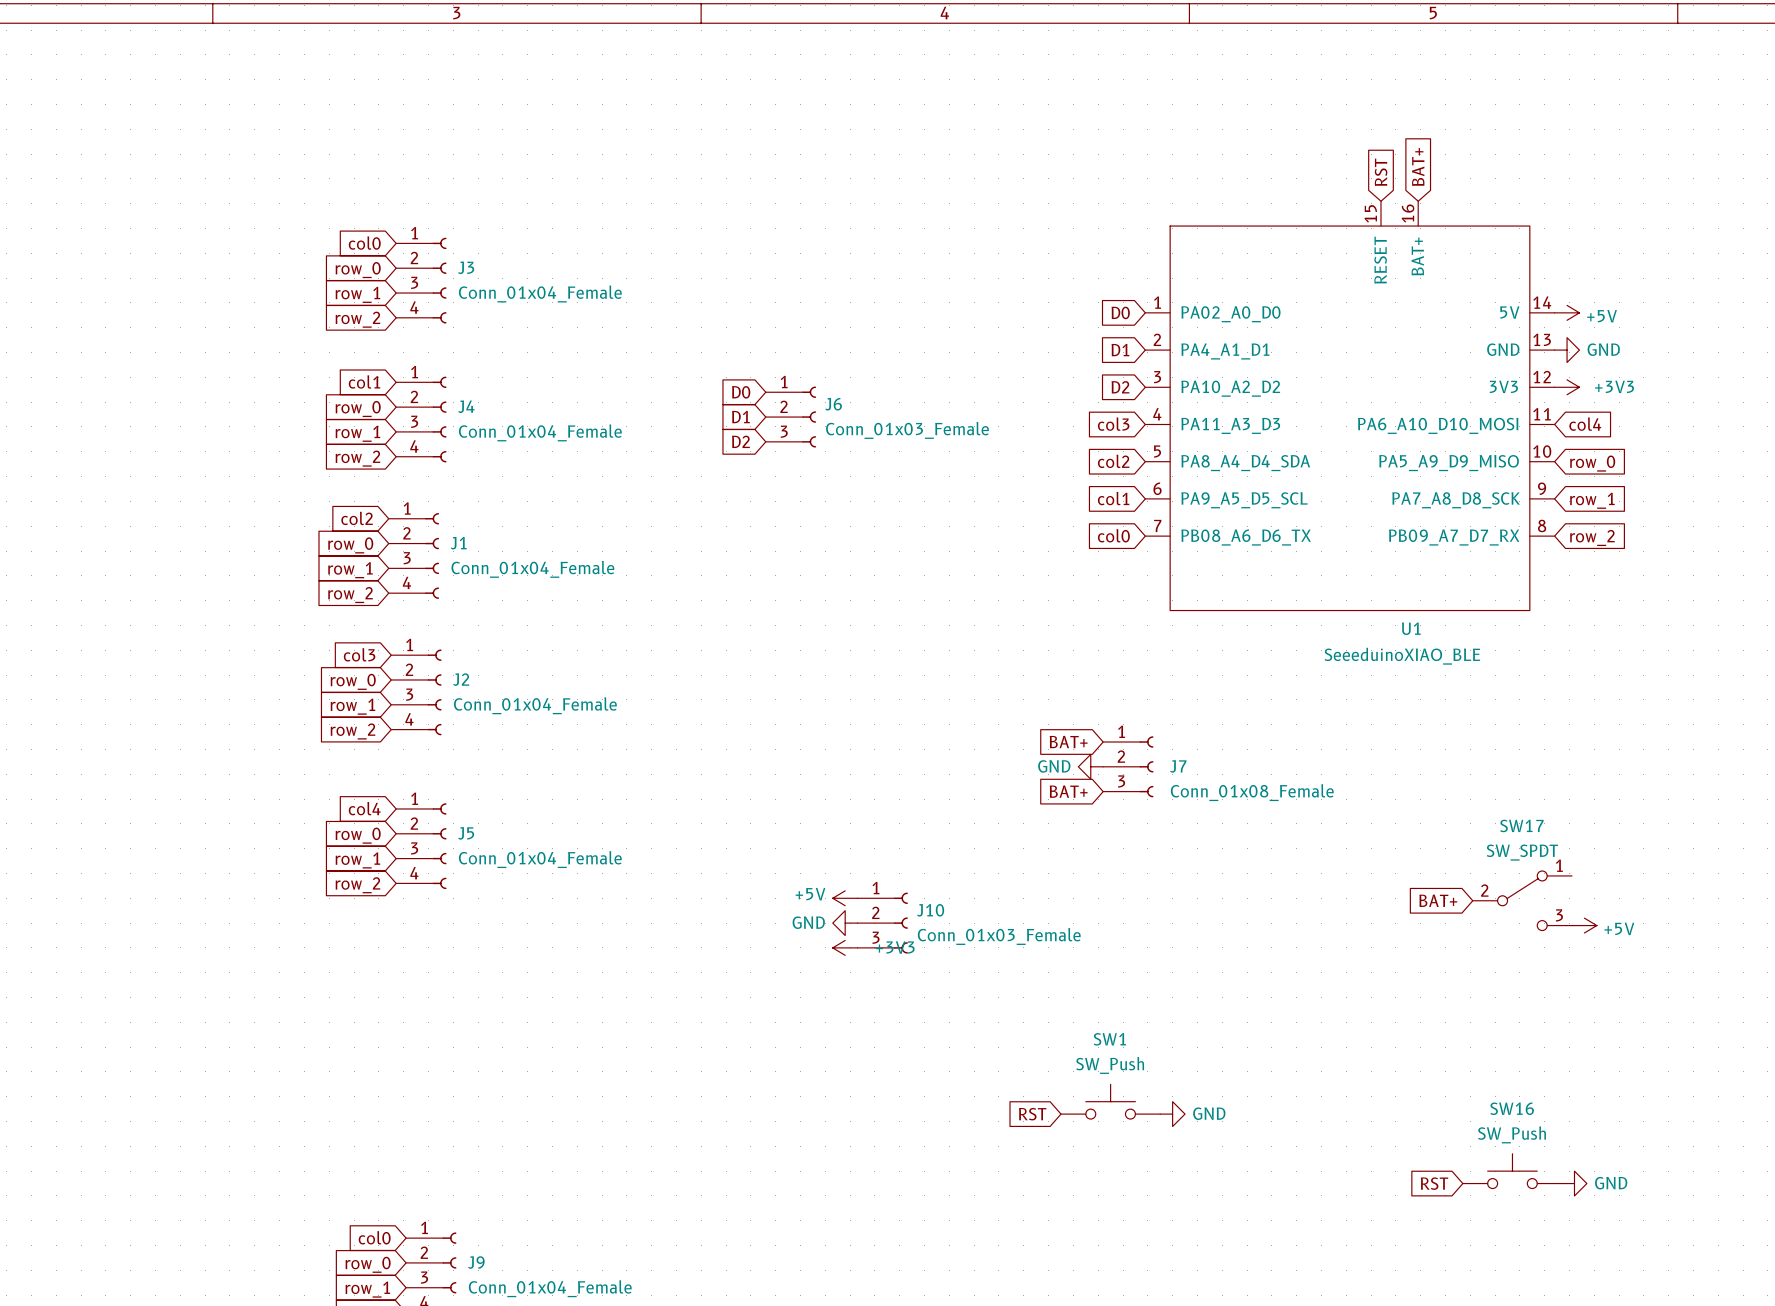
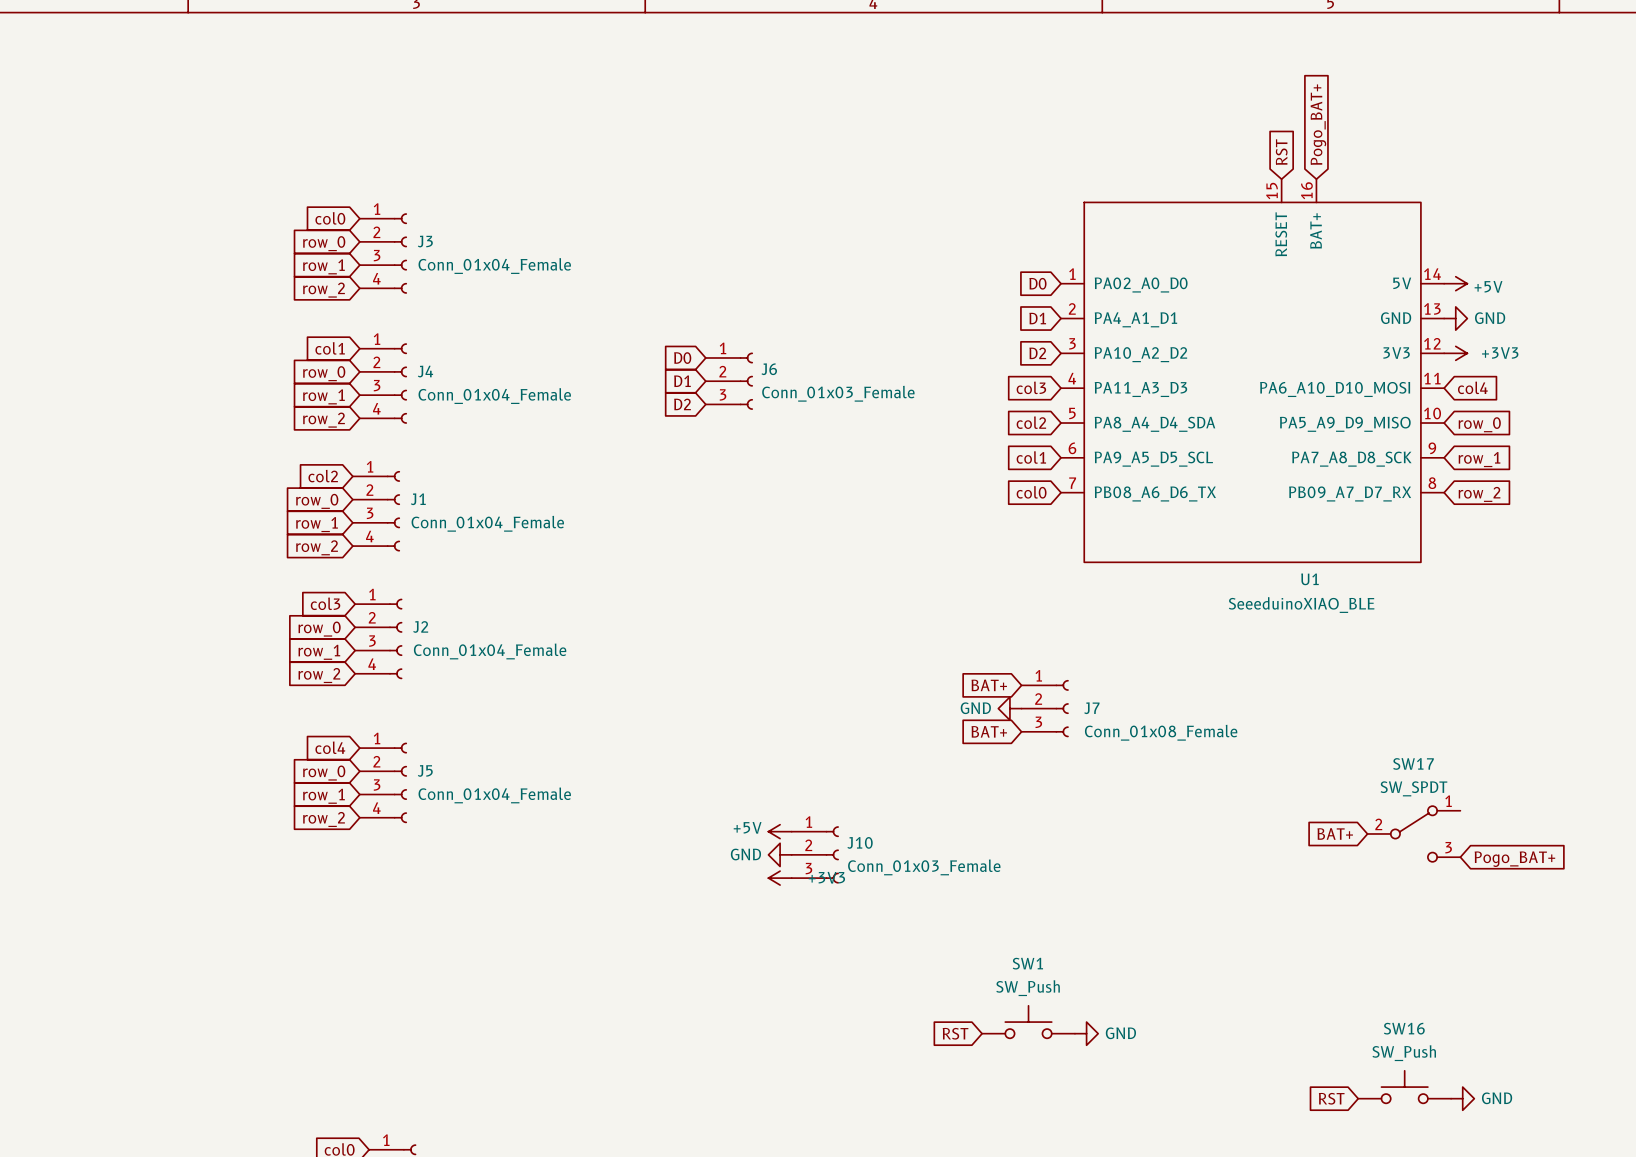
global label: BAT+ (1418, 167) -> Pogo_BAT+ (1318, 124)
power symbol: +5V (1584, 925) -> none
global label: none -> Pogo_BAT+ (1514, 859)

